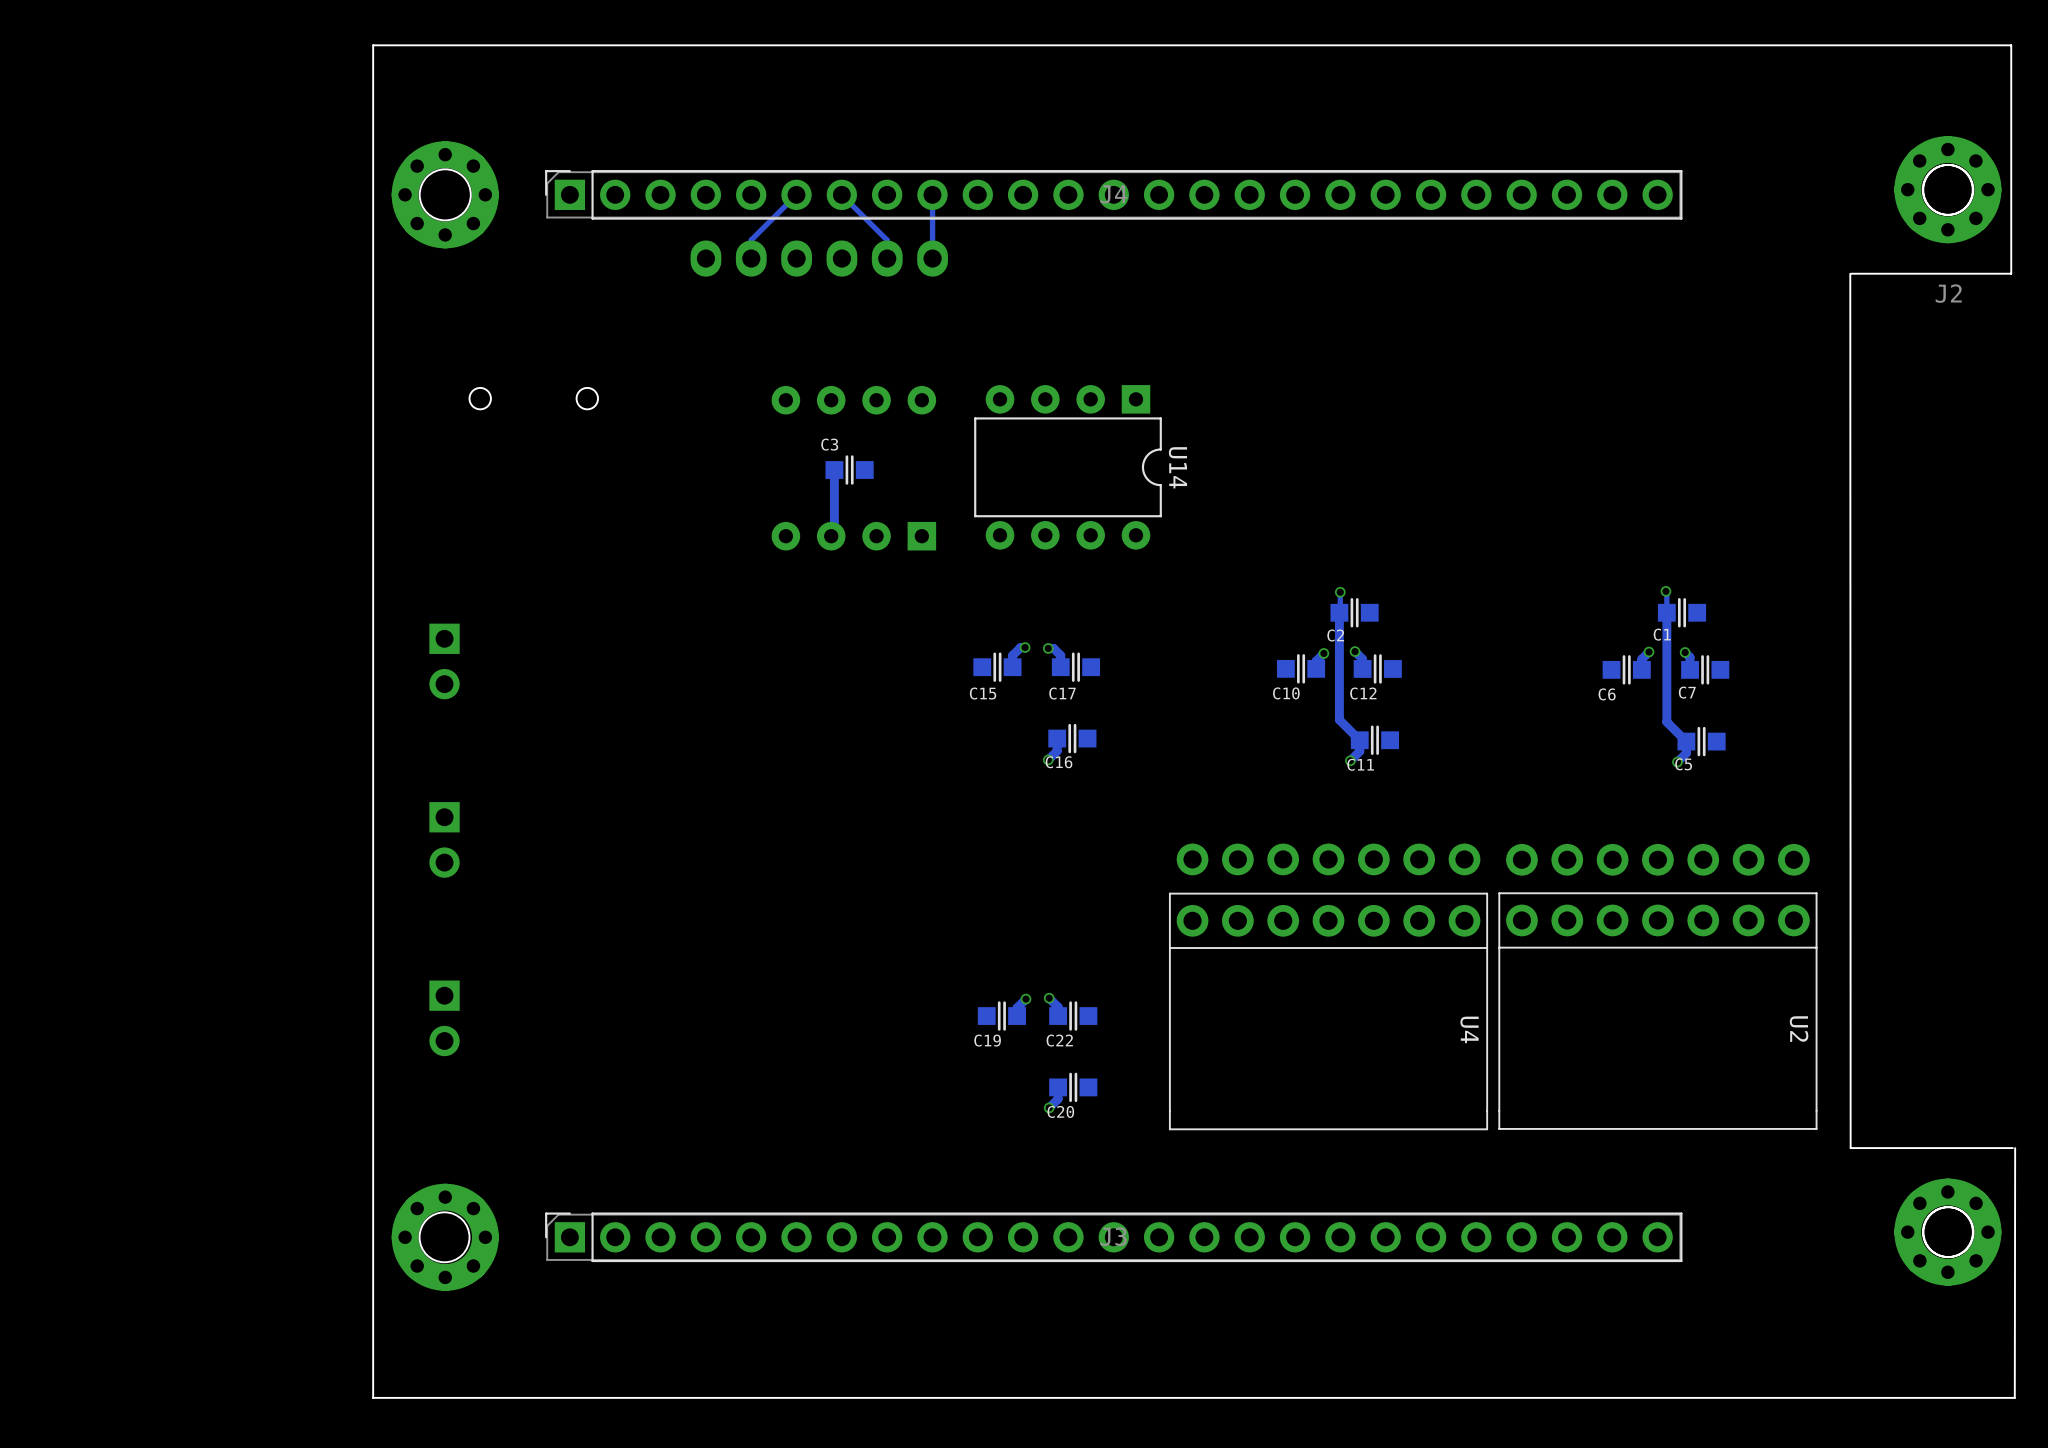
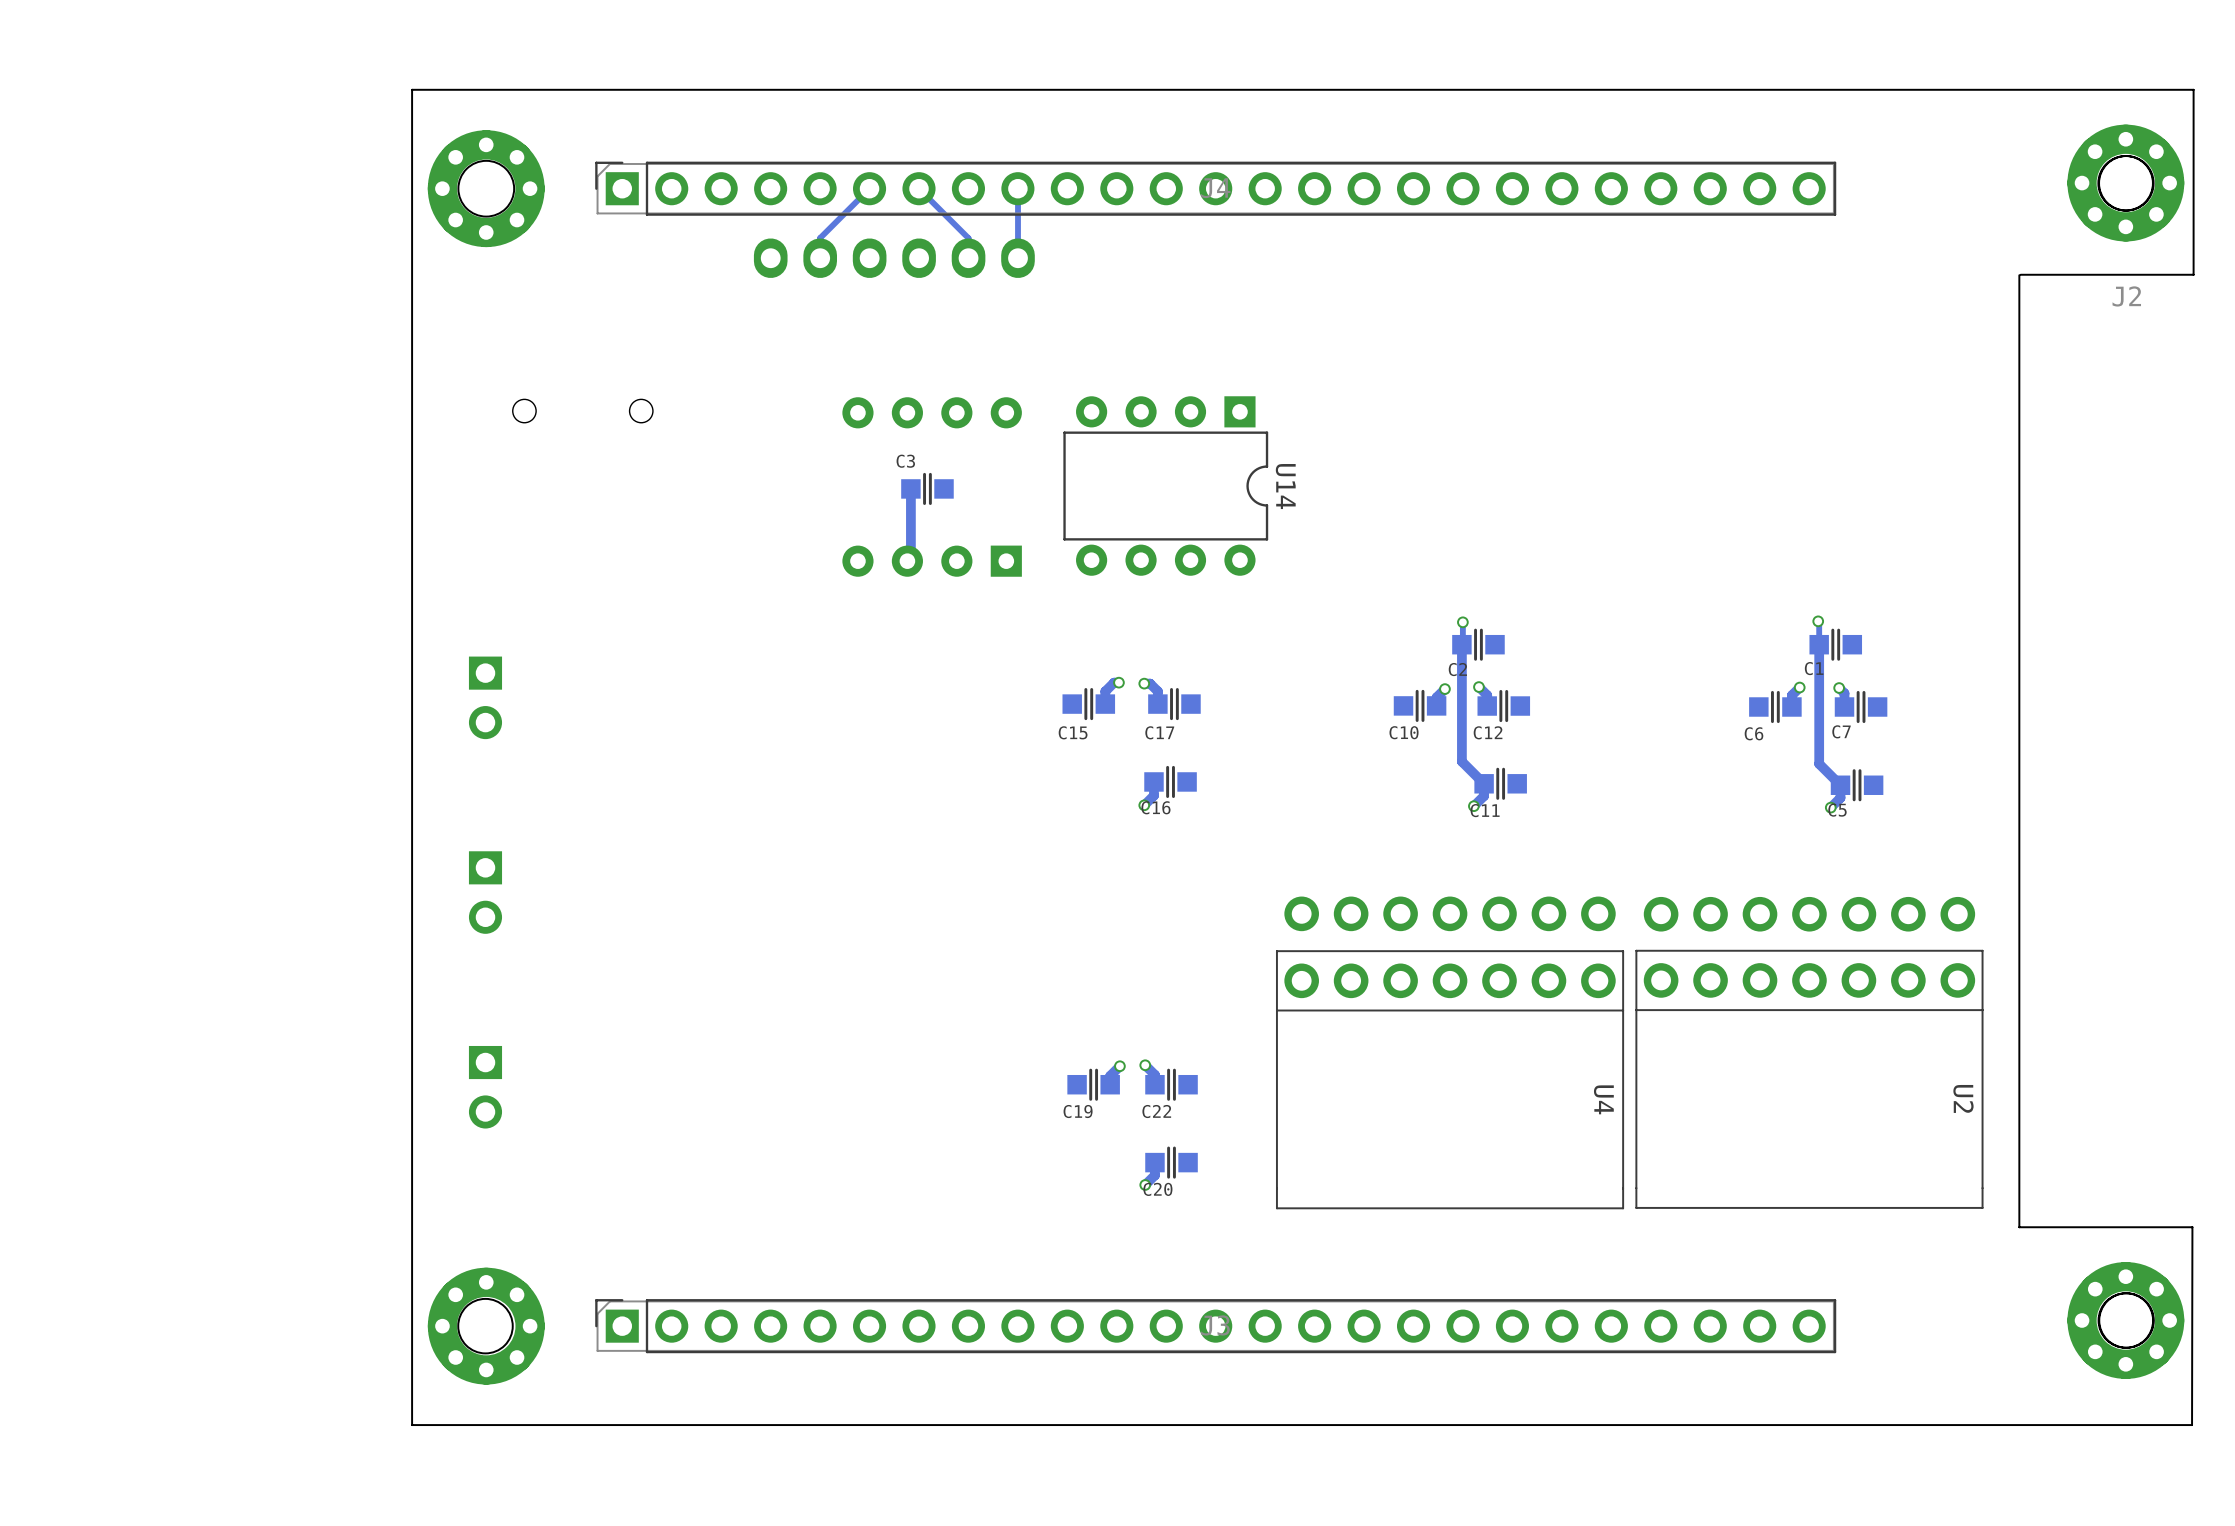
board edge: (1850, 273) (1850, 1148) (2012, 1148) -> (2019, 275) (2019, 1227) (2192, 1227) (2192, 1425) (412, 1425) (412, 89) (2193, 89) (2193, 274)
board edge: (2009, 273) (2011, 45) (373, 45) (373, 1397) (2014, 1397) (2015, 1148) -> none

